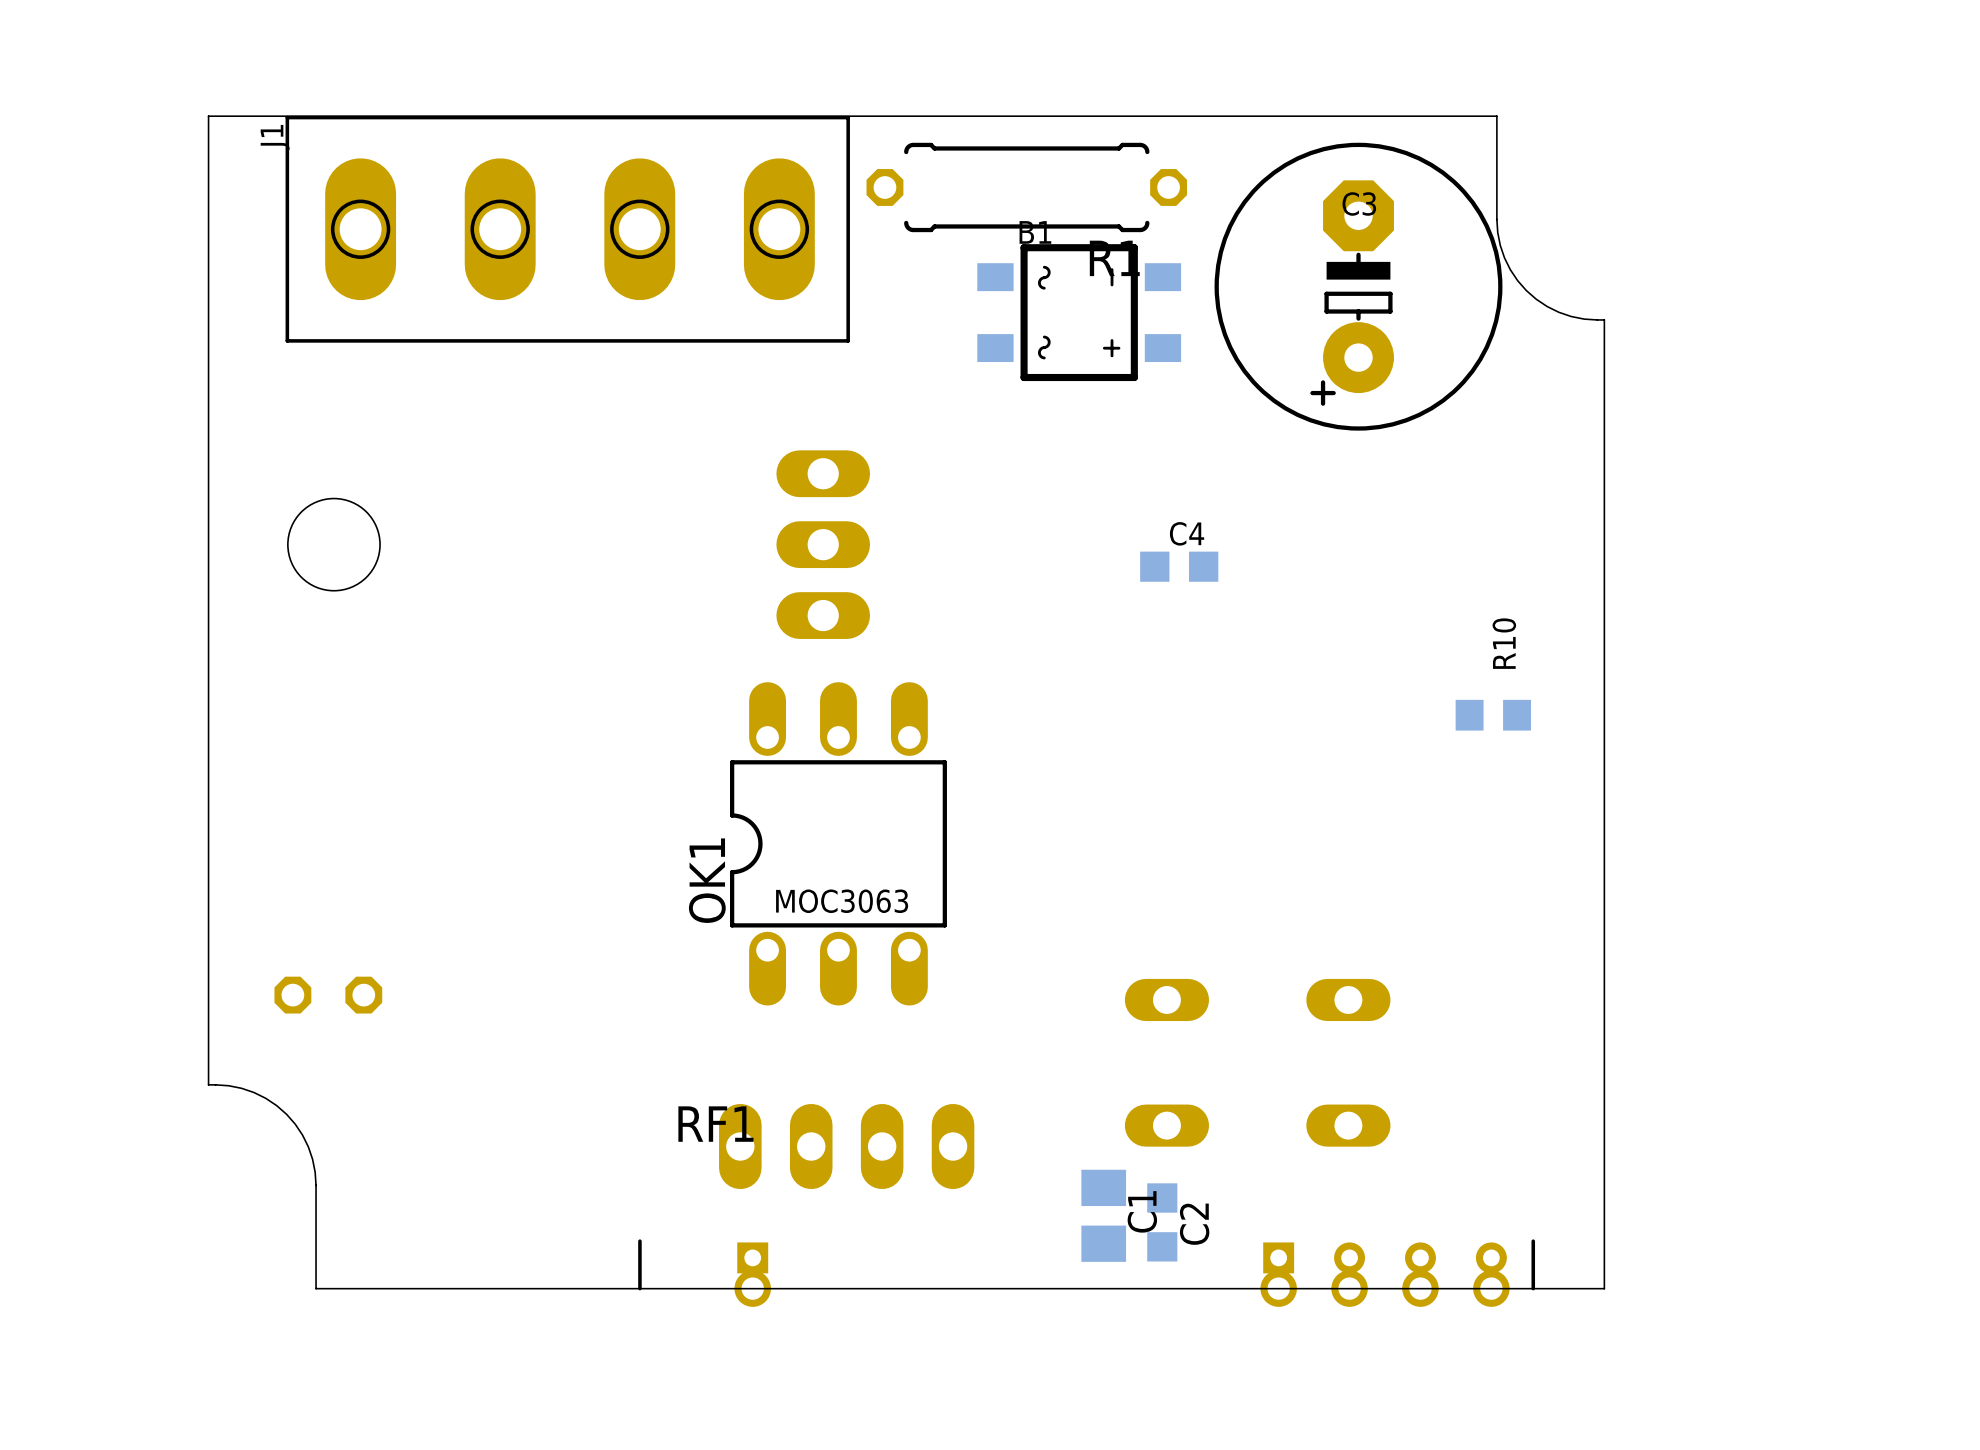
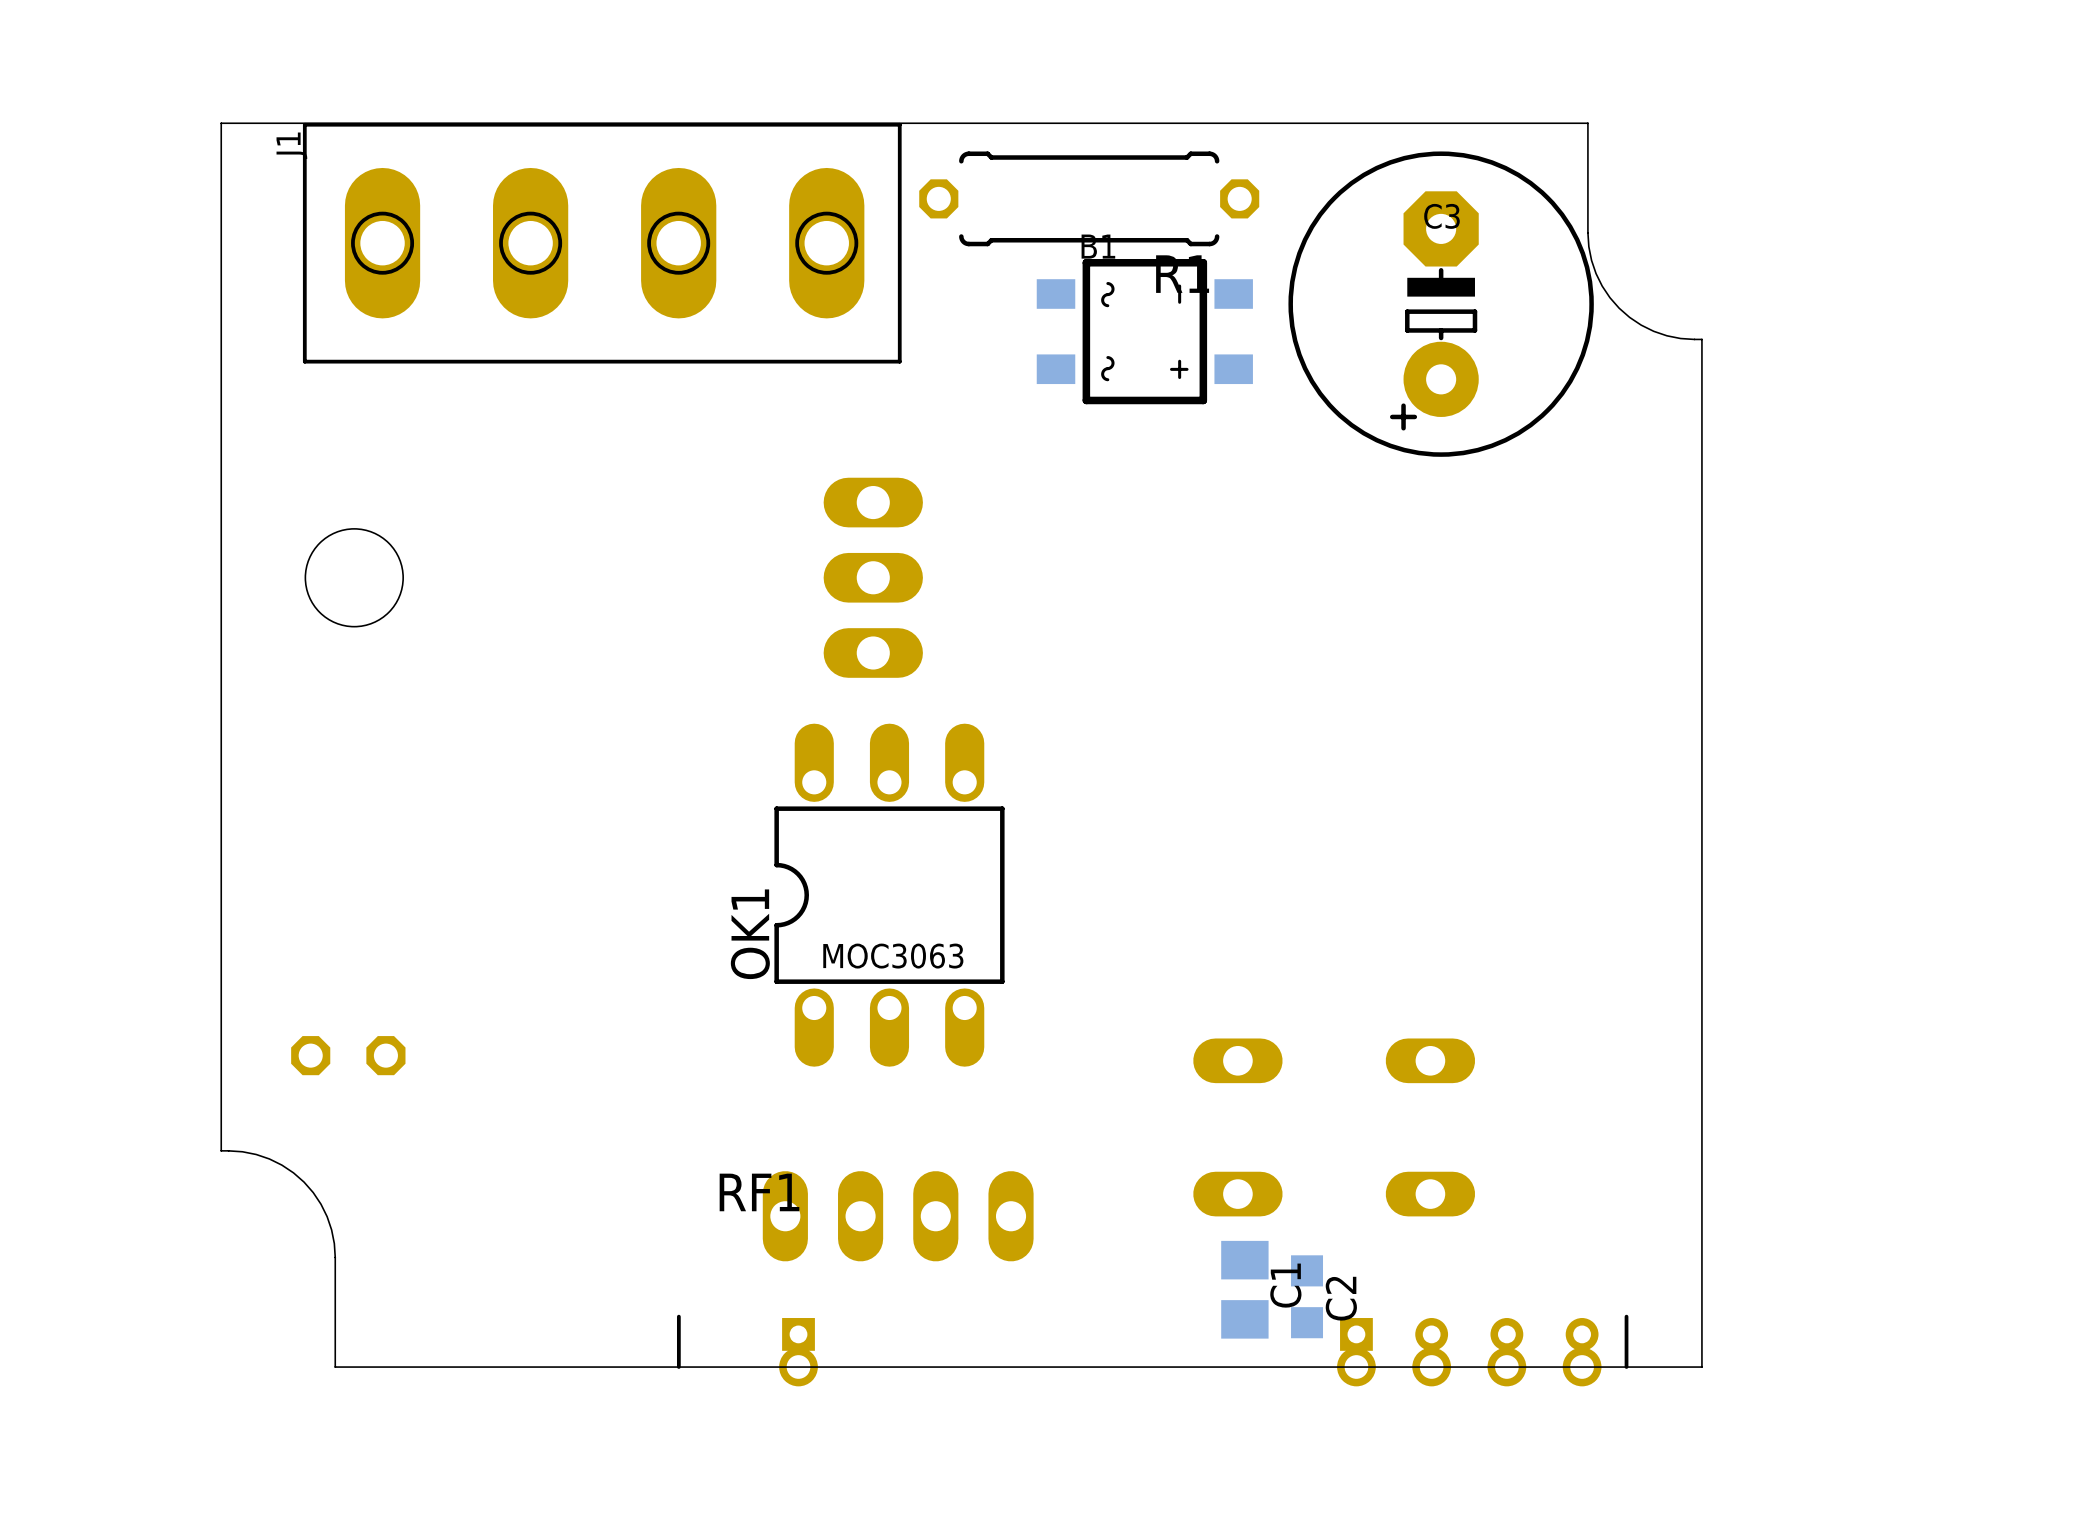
C4: (1179, 566) -> none
R10: (1493, 715) -> none
C1 position: (1103, 1215) -> (1244, 1289)
C2 position: (1162, 1222) -> (1307, 1296)

